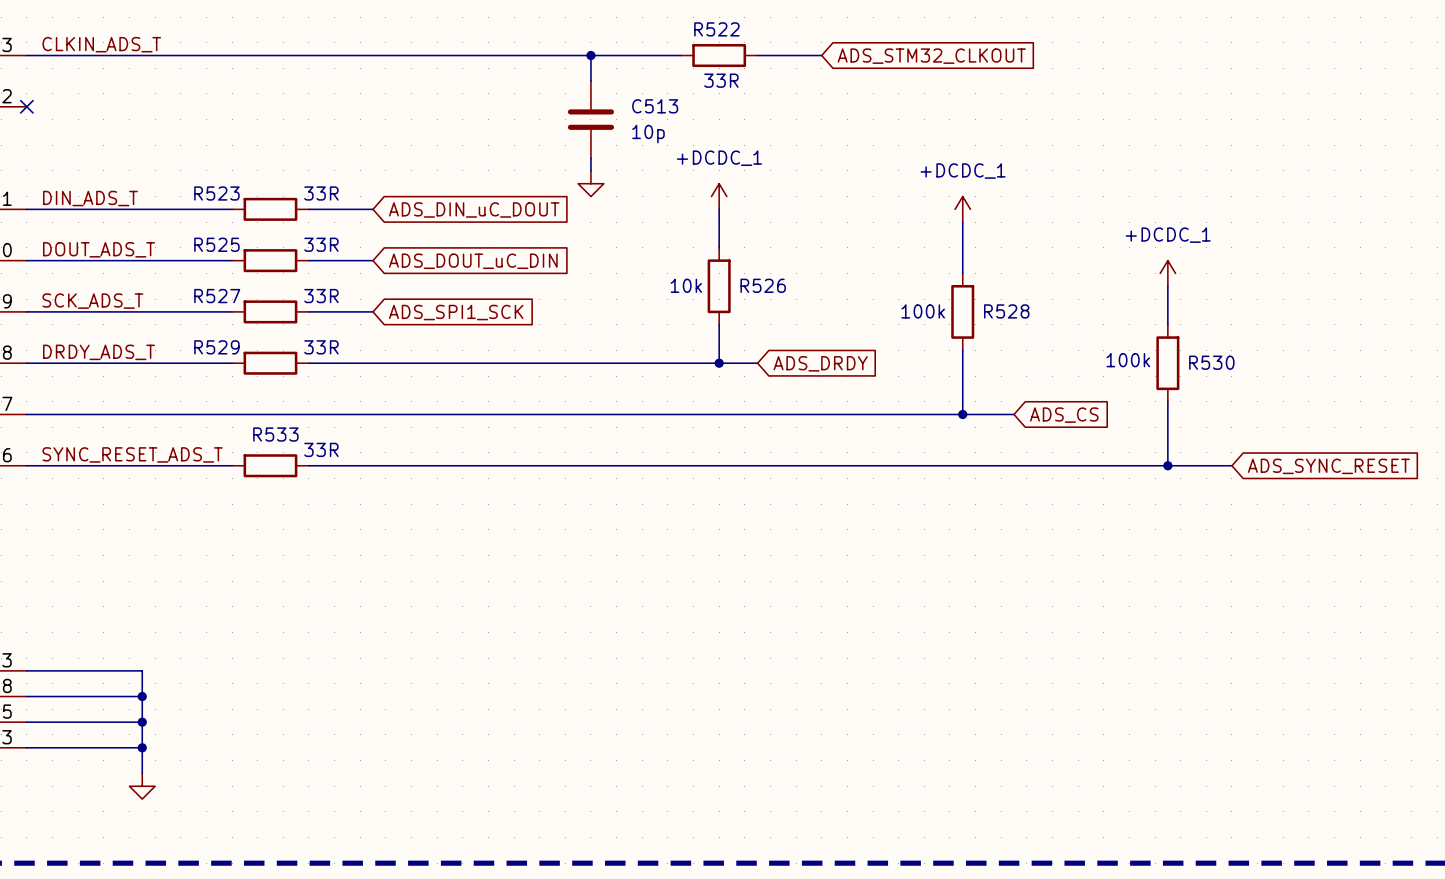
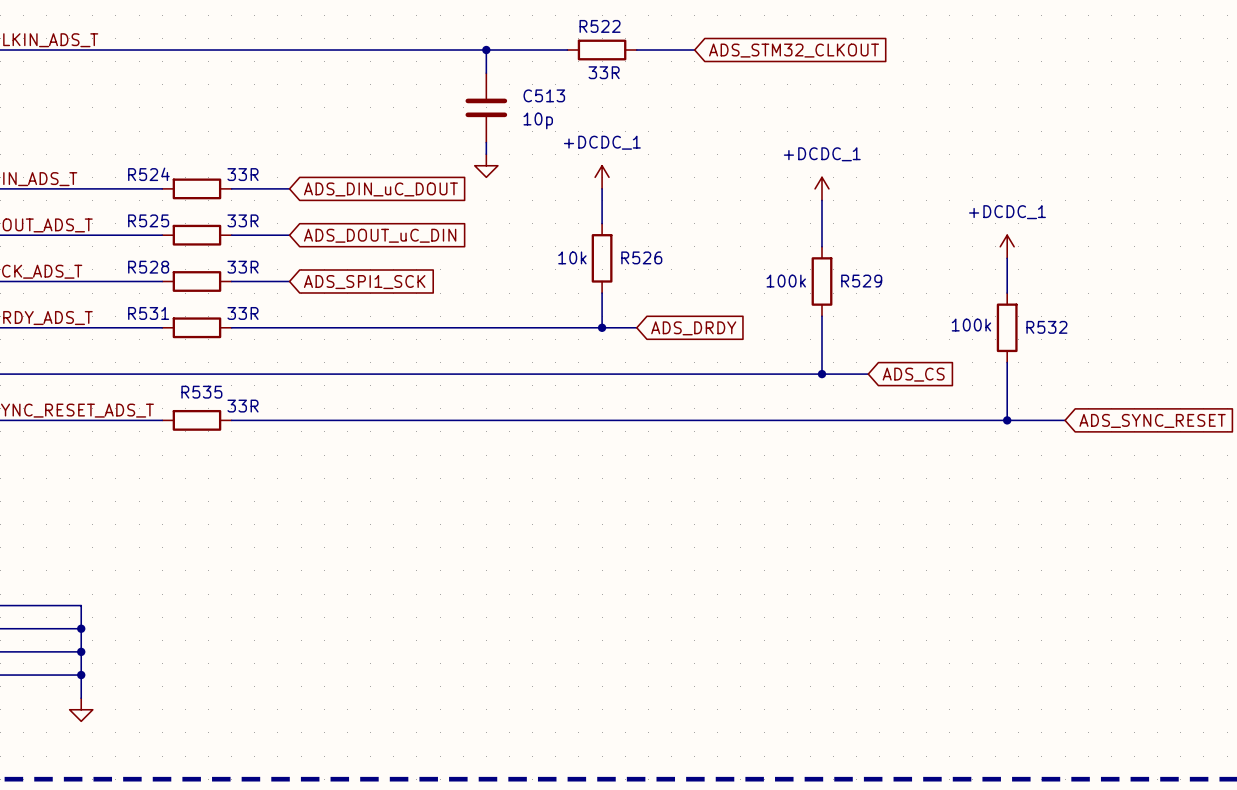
R523 name: R523 (216, 193) -> R524 (148, 174)
R527 name: R527 (217, 296) -> R528 (148, 267)
R528 name: R528 (1006, 311) -> R529 (861, 281)
R529 name: R529 (216, 347) -> R531 (148, 313)
R530 name: R530 (1211, 362) -> R532 (1046, 327)
R533 name: R533 (275, 434) -> R535 (201, 392)

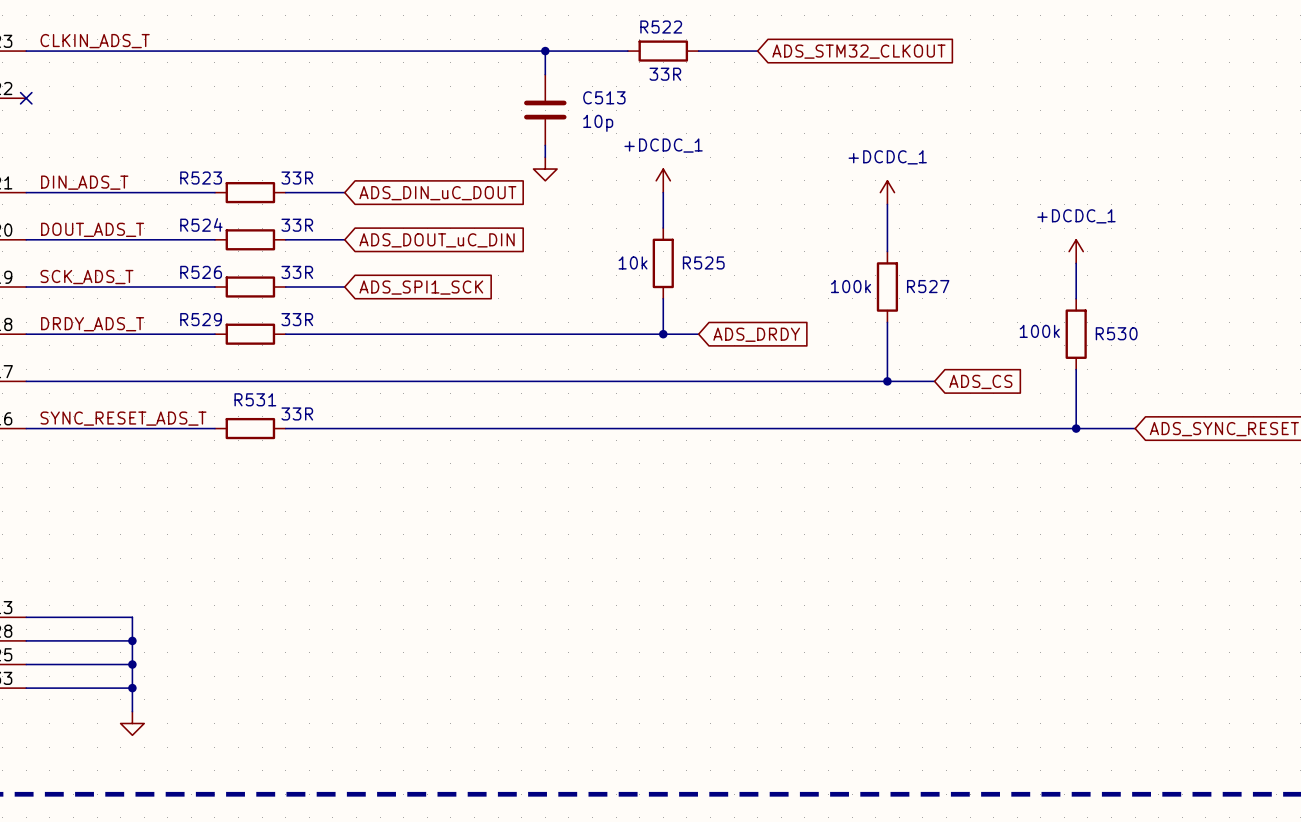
R524 name: R524 (148, 174) -> R523 (201, 178)
R525 name: R525 (148, 220) -> R524 (201, 224)
R526 name: R526 (641, 257) -> R525 (703, 262)
R528 name: R528 (148, 267) -> R526 (201, 272)
R529 name: R529 (861, 281) -> R527 (928, 286)
R531 name: R531 (148, 313) -> R529 (201, 319)
R532 name: R532 (1046, 327) -> R530 (1116, 333)
R535 name: R535 (201, 392) -> R531 (255, 399)

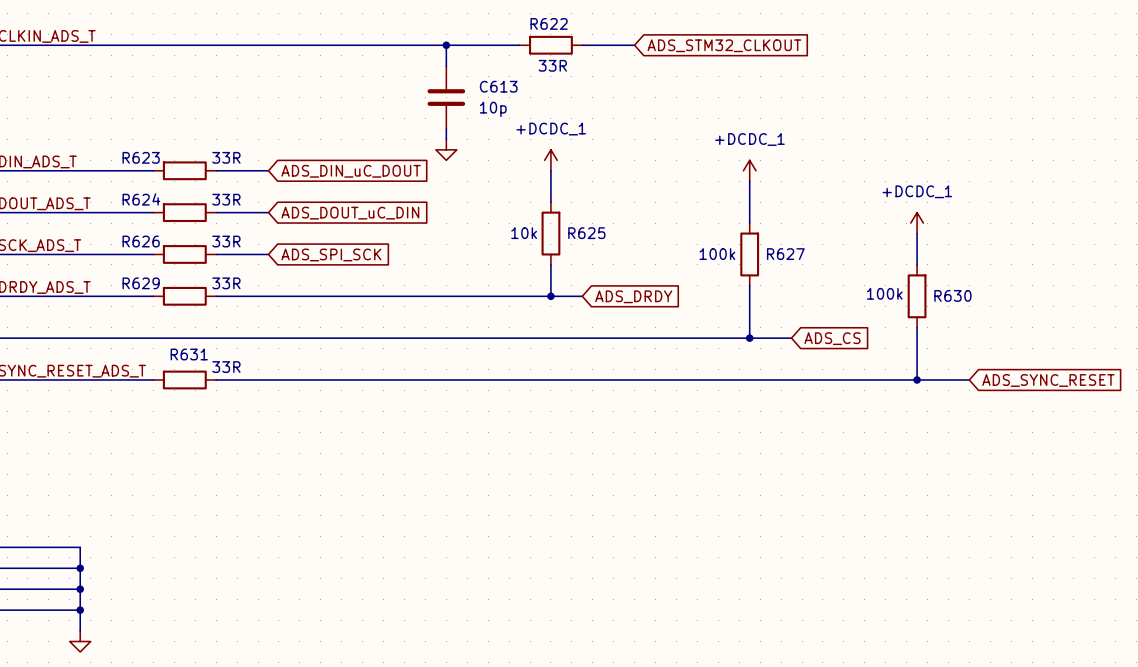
R522 name: R522 (661, 27) -> R622 (549, 23)
C513 name: C513 (604, 97) -> C613 (498, 86)
R523 name: R523 (201, 178) -> R623 (141, 157)
R524 name: R524 (201, 224) -> R624 (141, 199)
R525 name: R525 (703, 262) -> R625 (586, 233)
R526 name: R526 (201, 272) -> R626 (141, 241)
R527 name: R527 (928, 286) -> R627 (785, 254)
global label: ADS_SPI1_SCK (421, 287) -> ADS_SPI_SCK (331, 254)
R529 name: R529 (201, 319) -> R629 (141, 283)
R530 name: R530 (1116, 333) -> R630 (952, 295)
R531 name: R531 (255, 399) -> R631 (189, 354)

